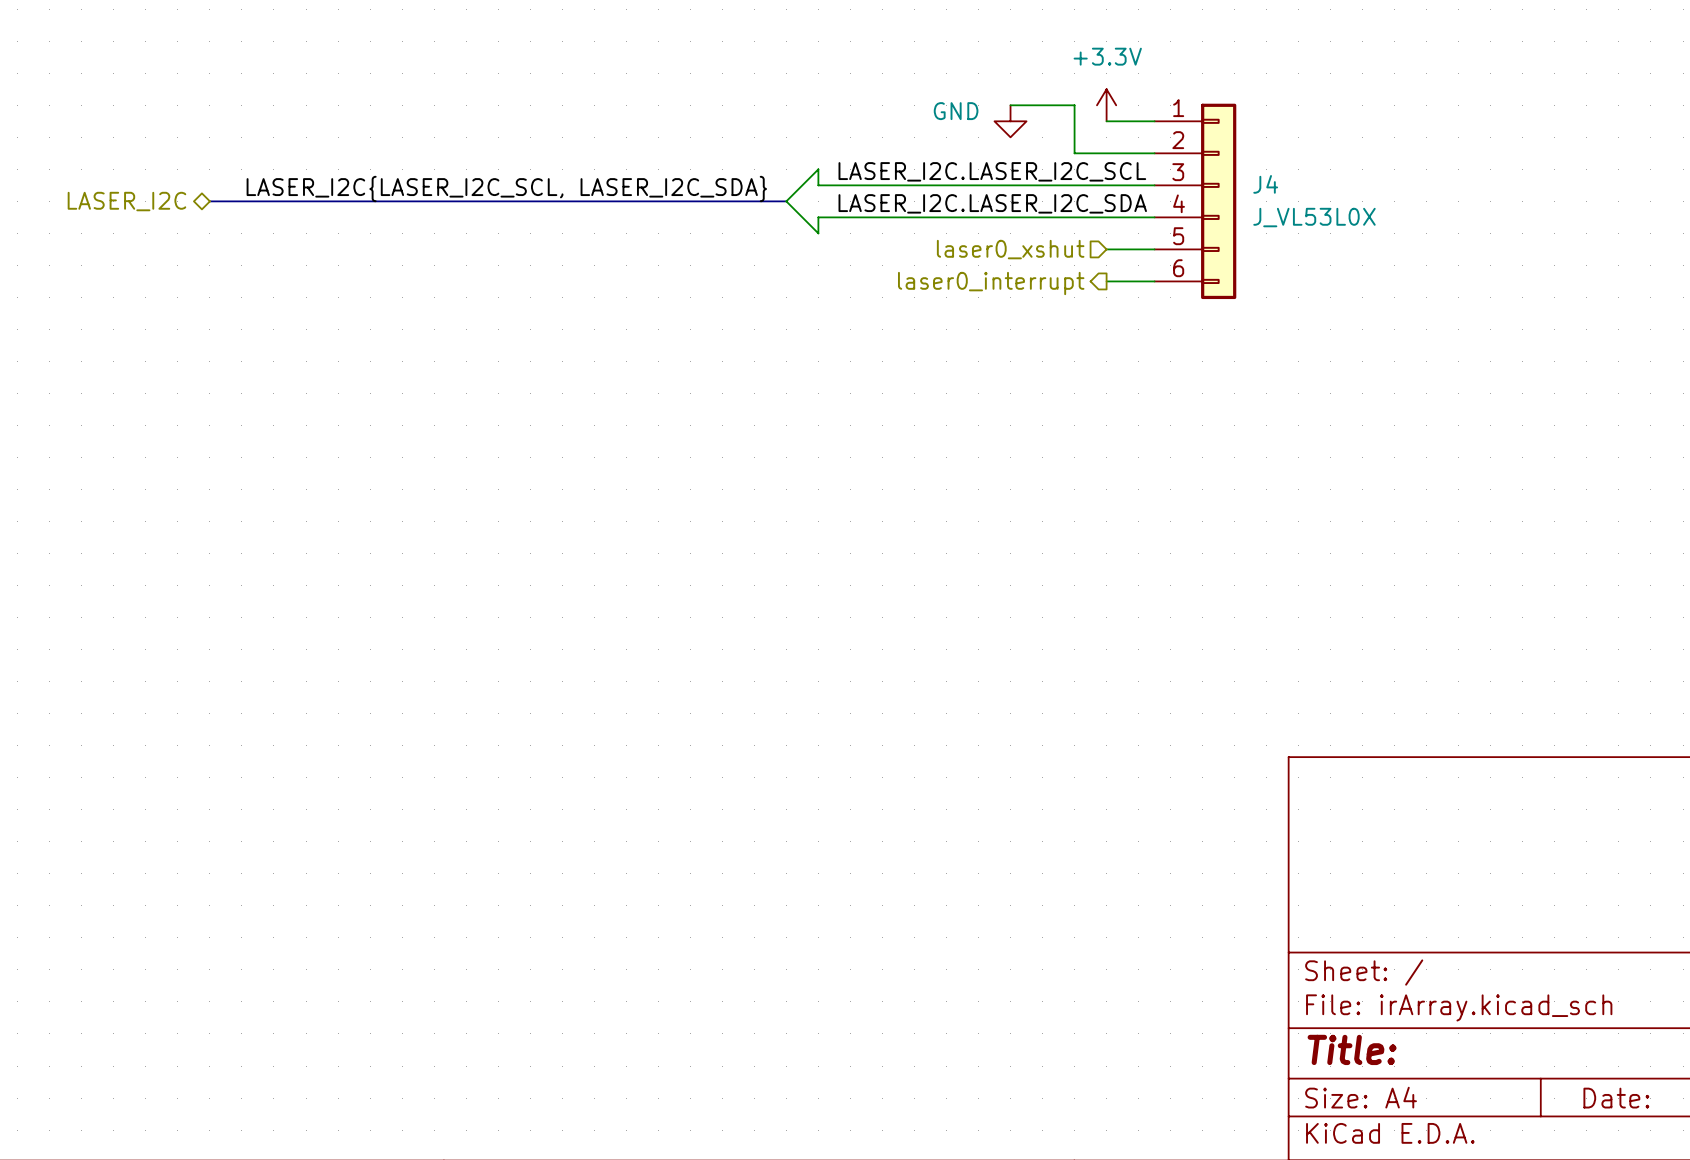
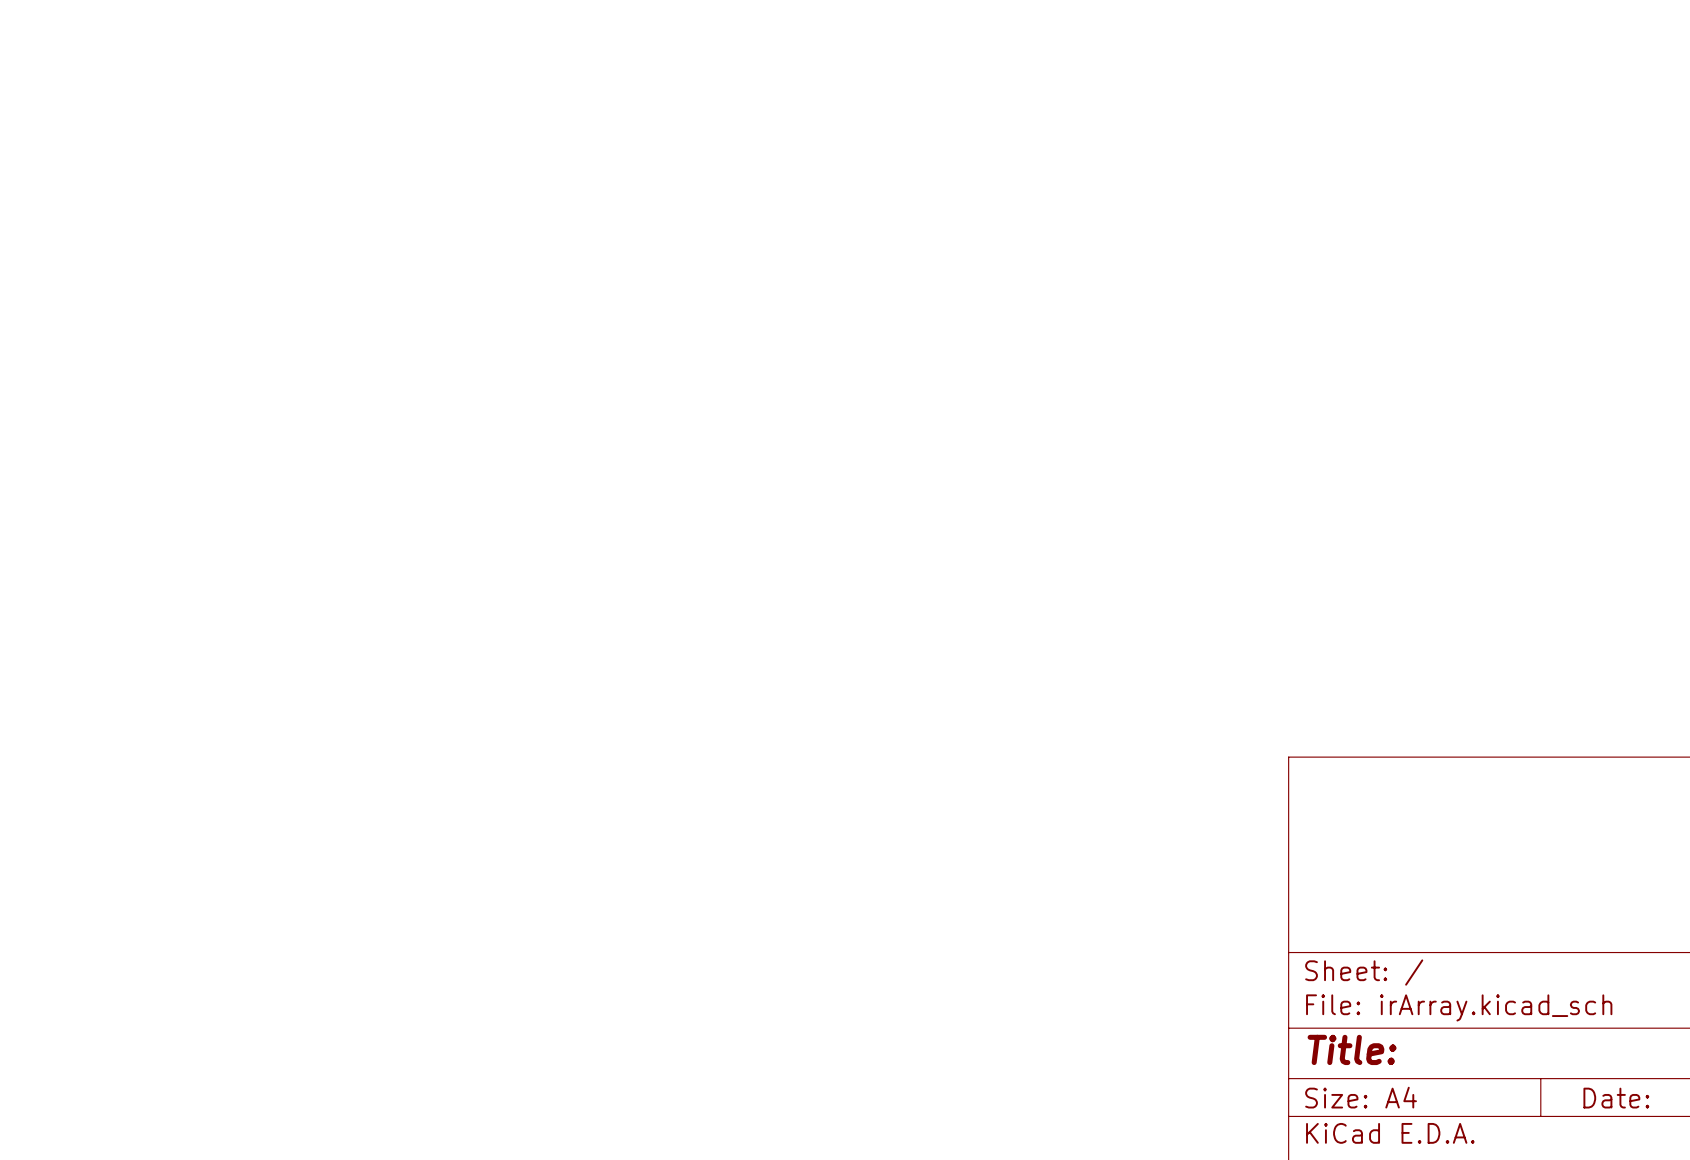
wire: (1010, 105) (1074, 105) (1074, 153) (1154, 153) -> none
power symbol: +3.3V (1106, 105) -> none
power symbol: GND (1010, 121) -> none
wire: (1106, 121) (1154, 121) -> none
label: LASER_I2C.LASER_I2C_SCL (992, 171) -> none
wire: (1154, 185) (818, 185) (818, 169) (786, 201) (818, 233) (818, 217) (1154, 217) -> none
label: LASER_I2C{LASER_I2C_SCL, LASER_I2C_SDA} (506, 188) -> none
hierarchical label: LASER_I2C (126, 201) -> none
bus: (209, 201) (786, 201) -> none
J4: J_VL53L0X (1195, 201) -> none
label: LASER_I2C.LASER_I2C_SDA (992, 203) -> none
hierarchical label: laser0_xshut (1010, 249) -> none
wire: (1106, 249) (1154, 249) -> none
wire: (1106, 281) (1154, 281) -> none
hierarchical label: laser0_interrupt (991, 283) -> none

